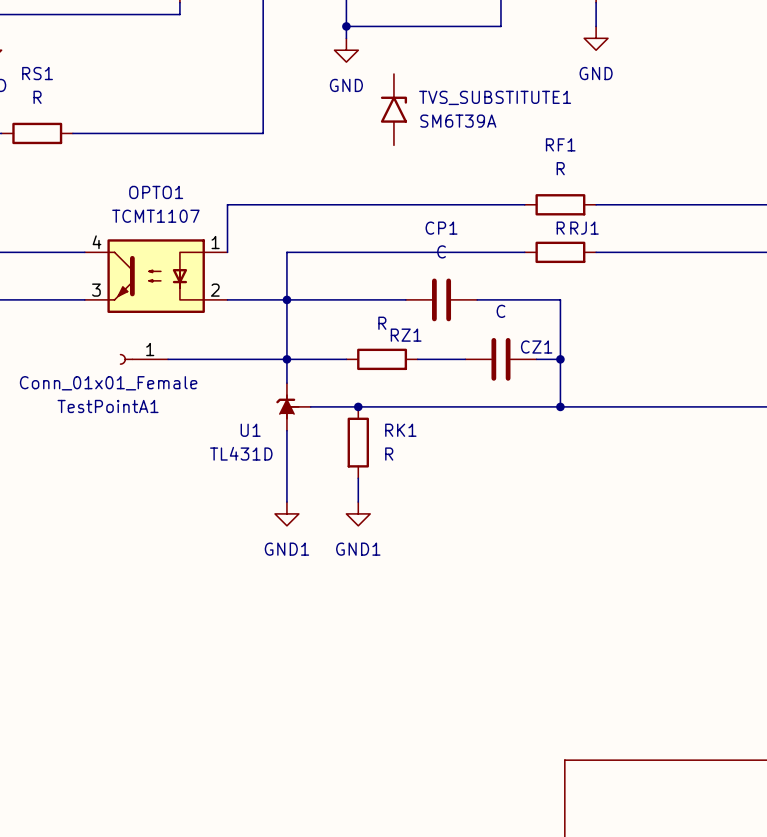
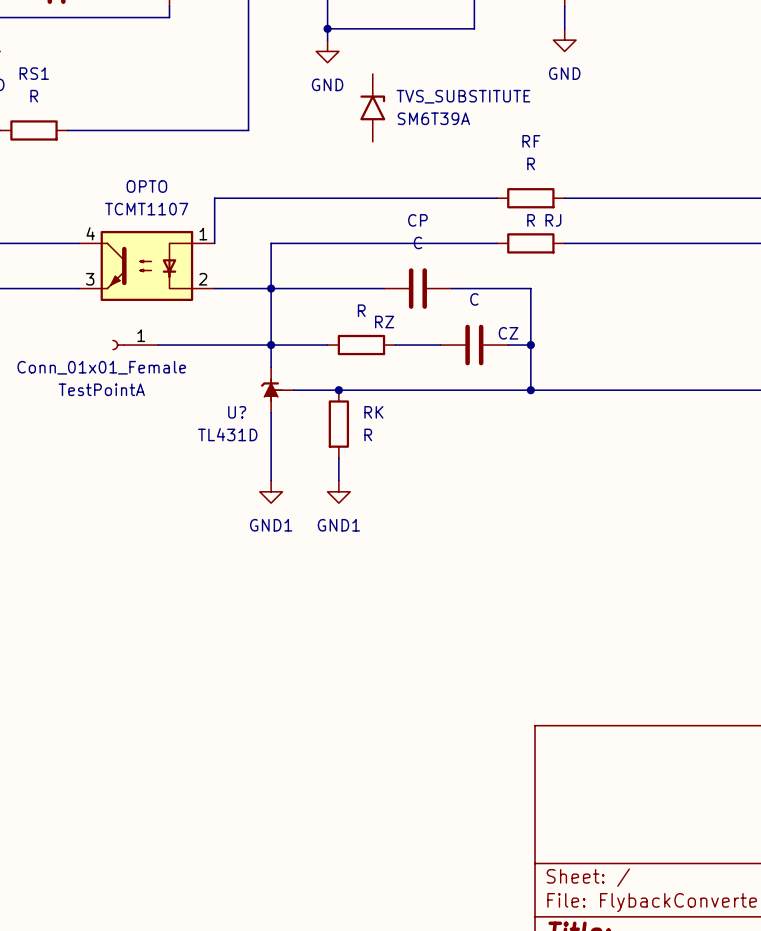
TVS_SUBSTITUTE1 name: TVS_SUBSTITUTE1 (495, 97) -> TVS_SUBSTITUTE (463, 96)
RF1 name: RF1 (560, 144) -> RF (531, 141)
OPTO1 name: OPTO1 (156, 192) -> OPTO (146, 186)
CP1 name: CP1 (441, 228) -> CP (417, 220)
RJ1 name: RJ1 (584, 228) -> RJ (553, 220)
RZ1 name: RZ1 (406, 335) -> RZ (384, 322)
CZ1 name: CZ1 (536, 347) -> CZ (508, 333)
TestPointA1 name: TestPointA1 (108, 406) -> TestPointA (101, 389)
U1 name: U1 (250, 430) -> U? (237, 412)
RK1 name: RK1 (400, 430) -> RK (373, 412)

